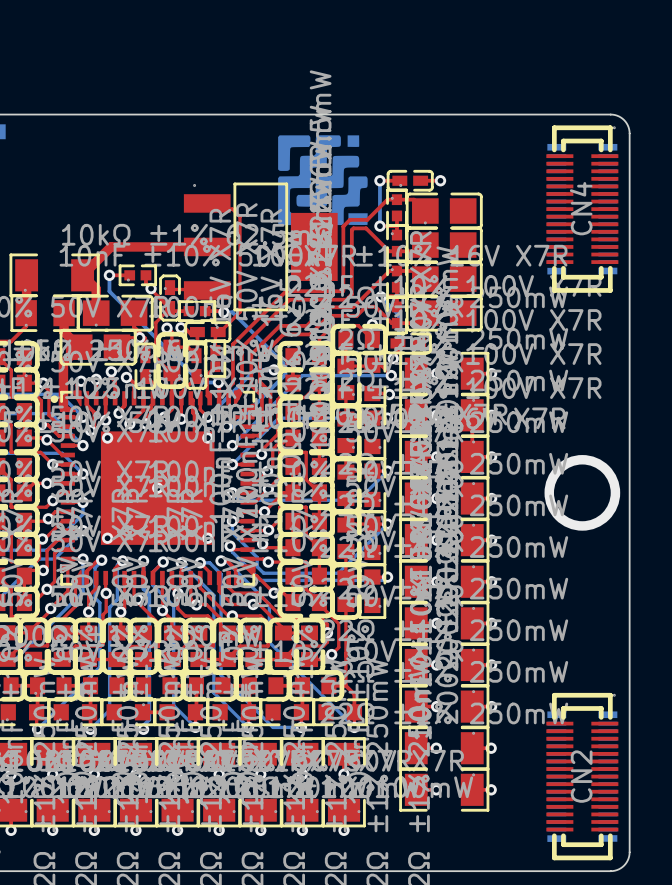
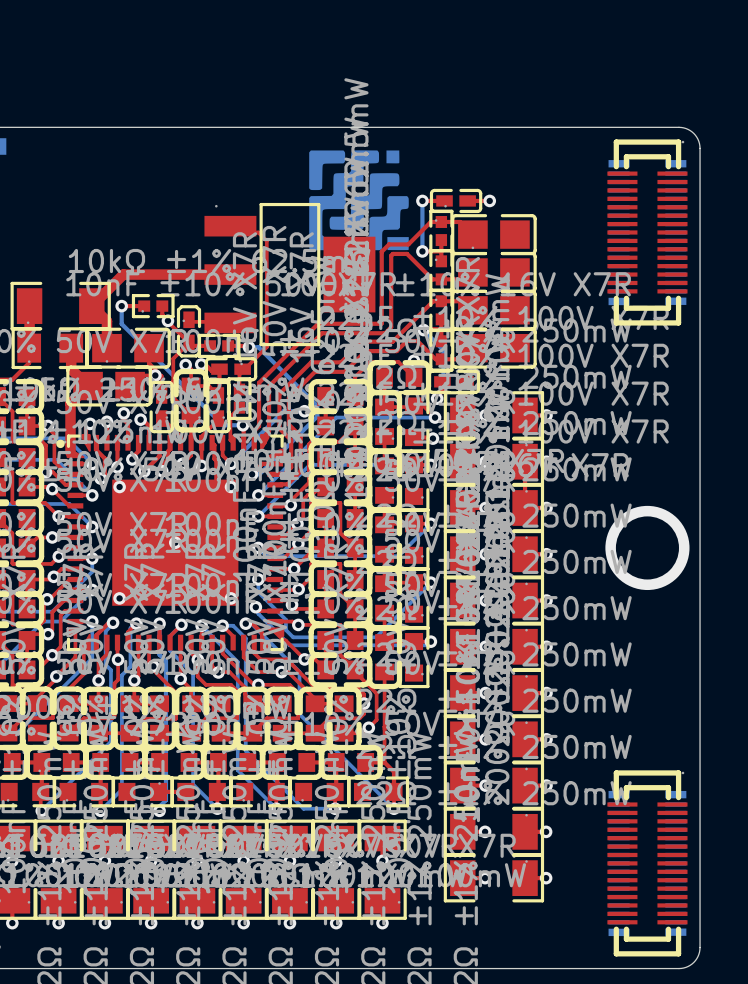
CN4 name: CN4 (581, 208) -> none
CN2 name: CN2 (581, 776) -> none

